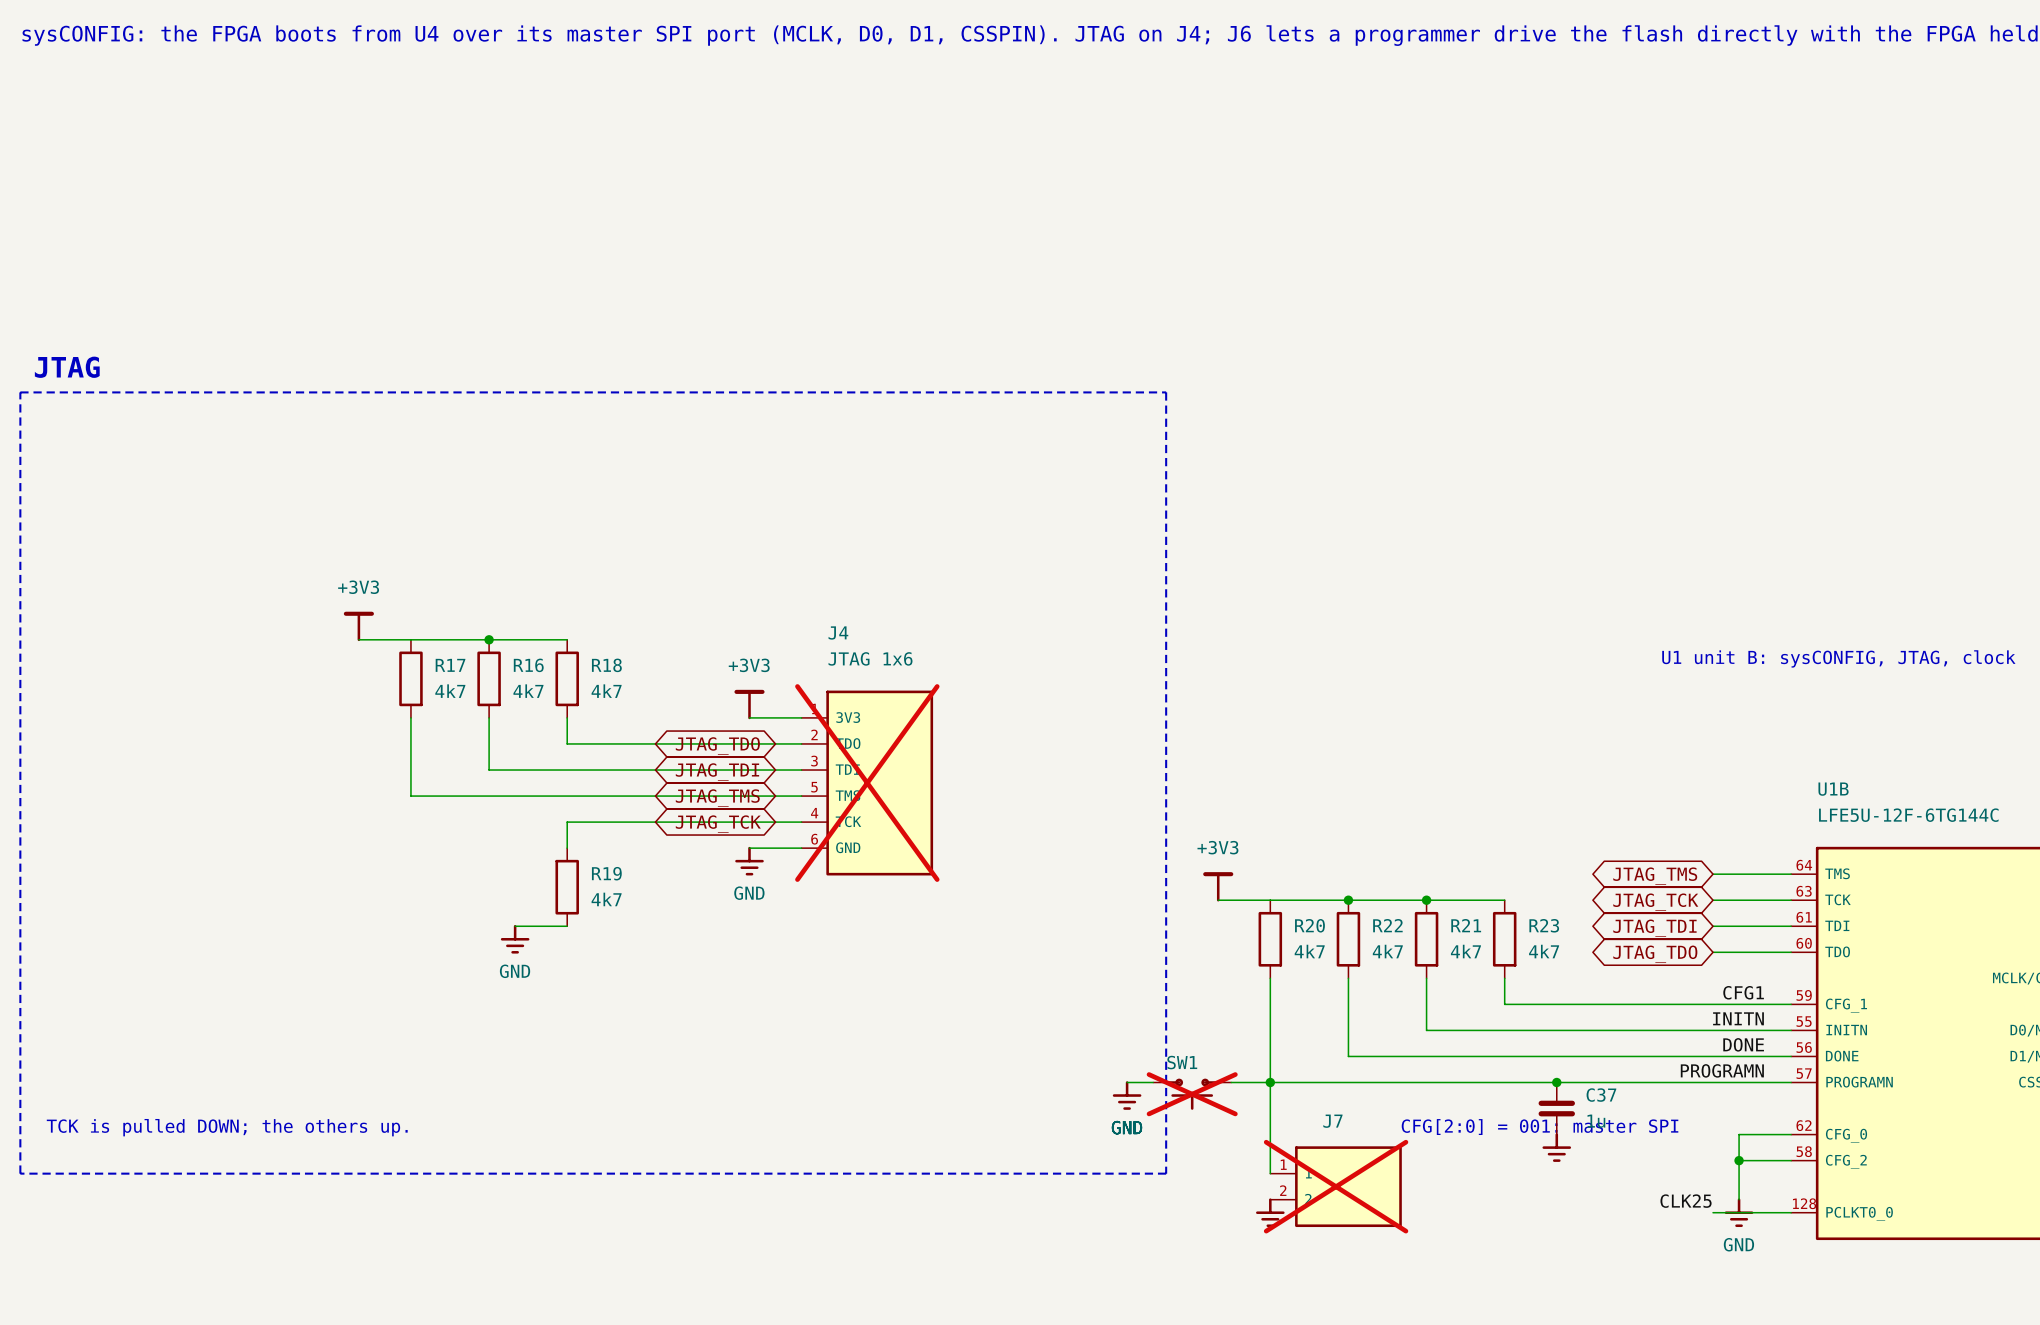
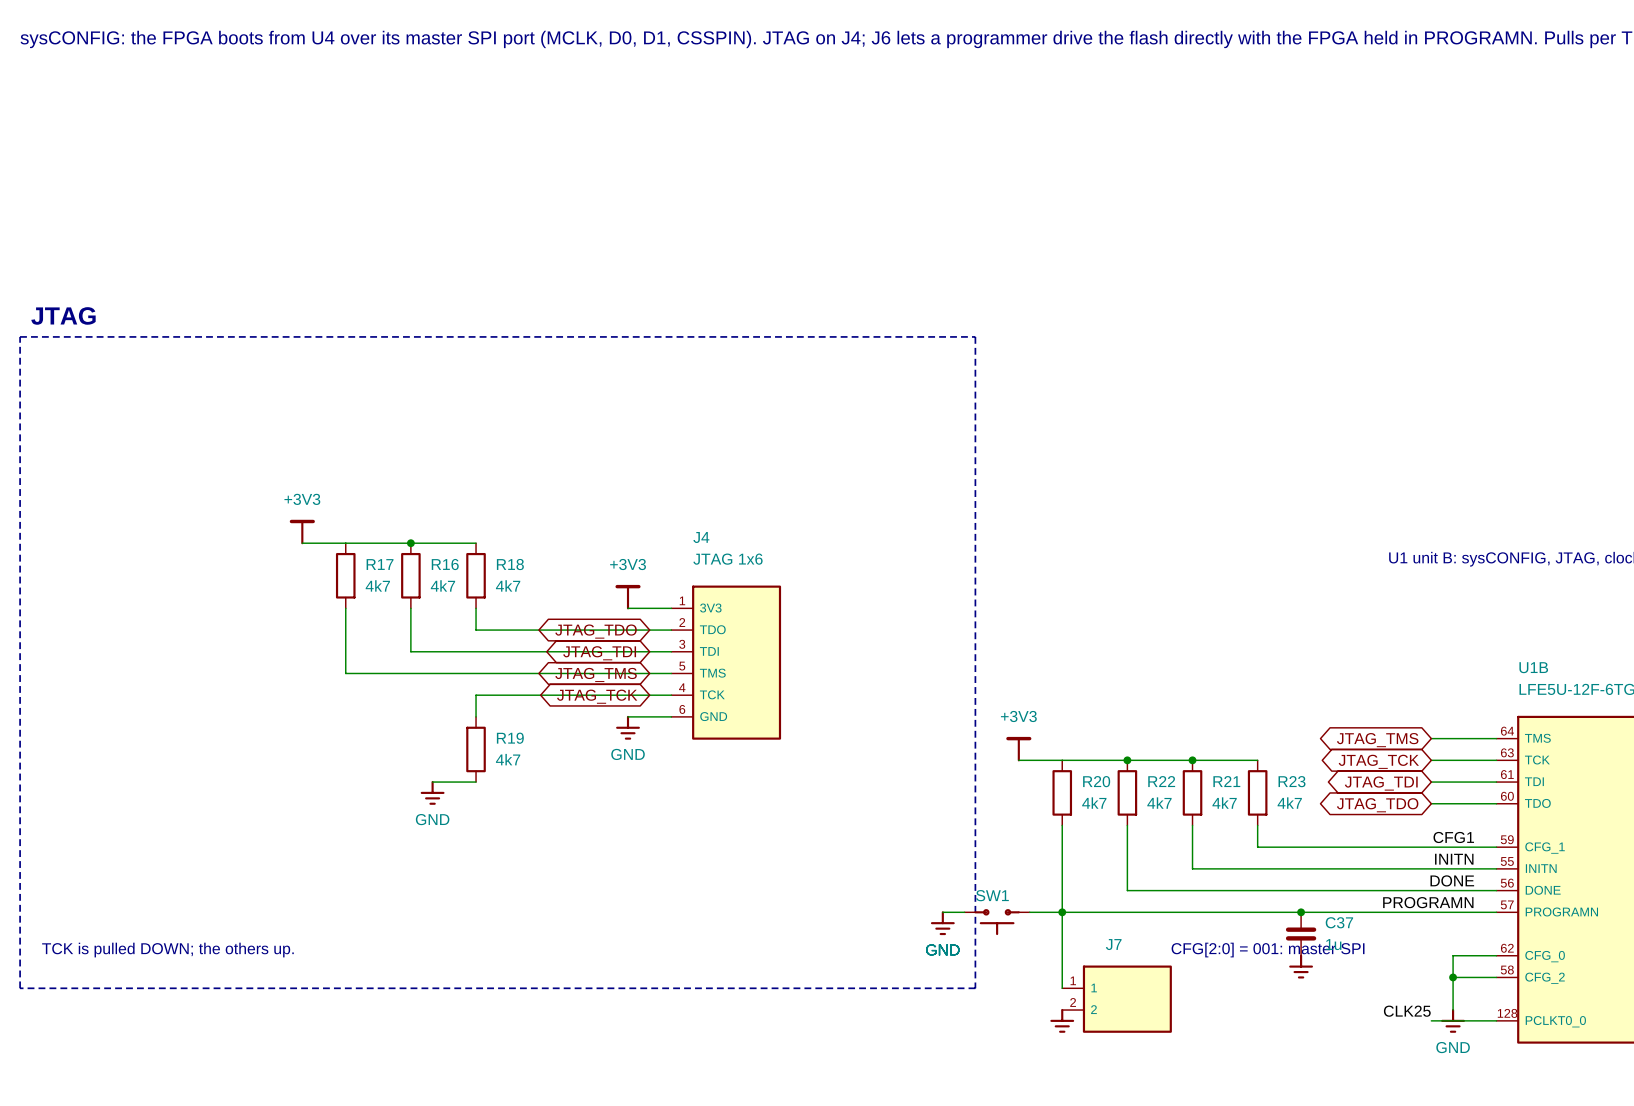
J4 do-not-place cross: (867, 783) -> none
SW1 do-not-place cross: (1192, 1094) -> none
J7 do-not-place cross: (1336, 1186) -> none

